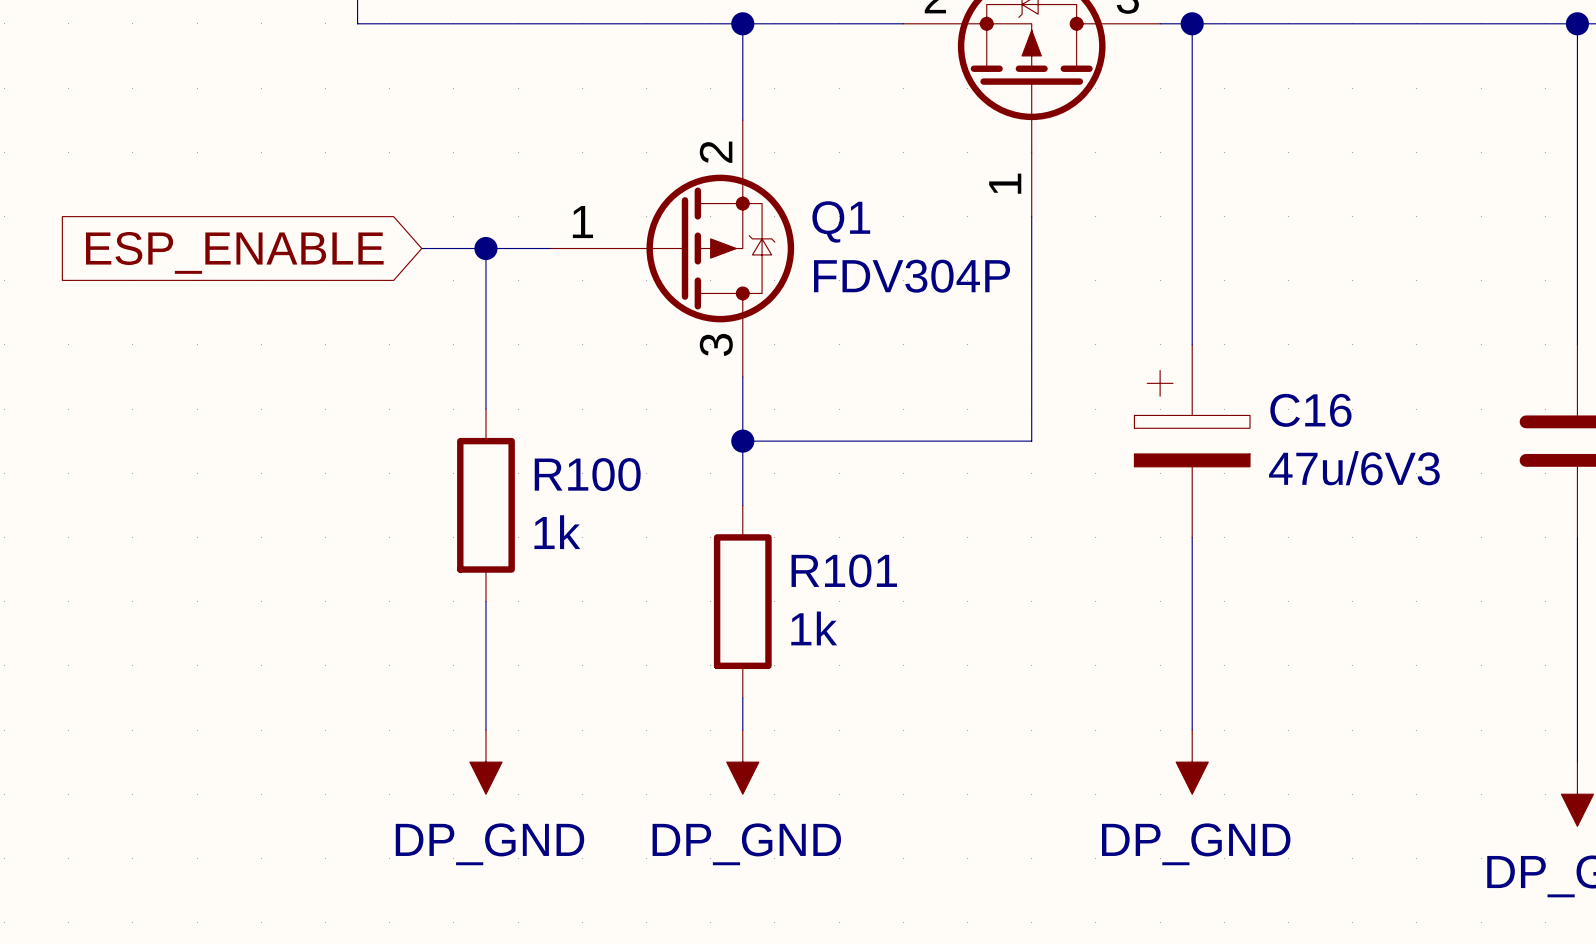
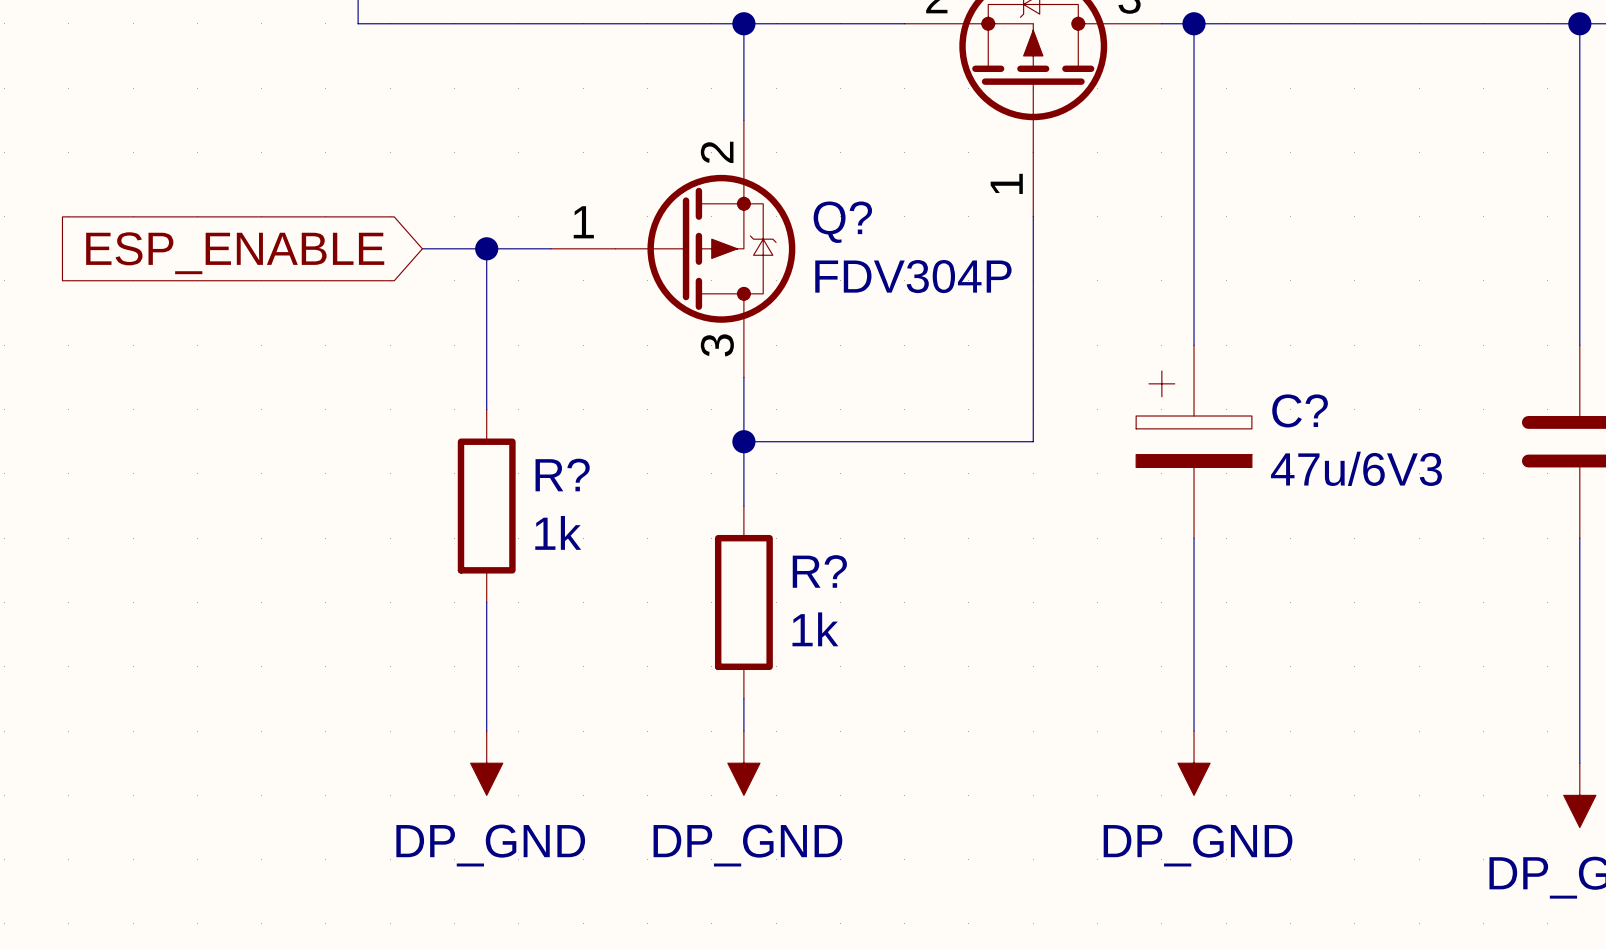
Q1 name: Q1 (841, 221) -> Q? (842, 222)
C16 name: C16 (1310, 410) -> C? (1300, 410)
R100 name: R100 (587, 474) -> R? (562, 475)
R101 name: R101 (844, 570) -> R? (819, 571)

